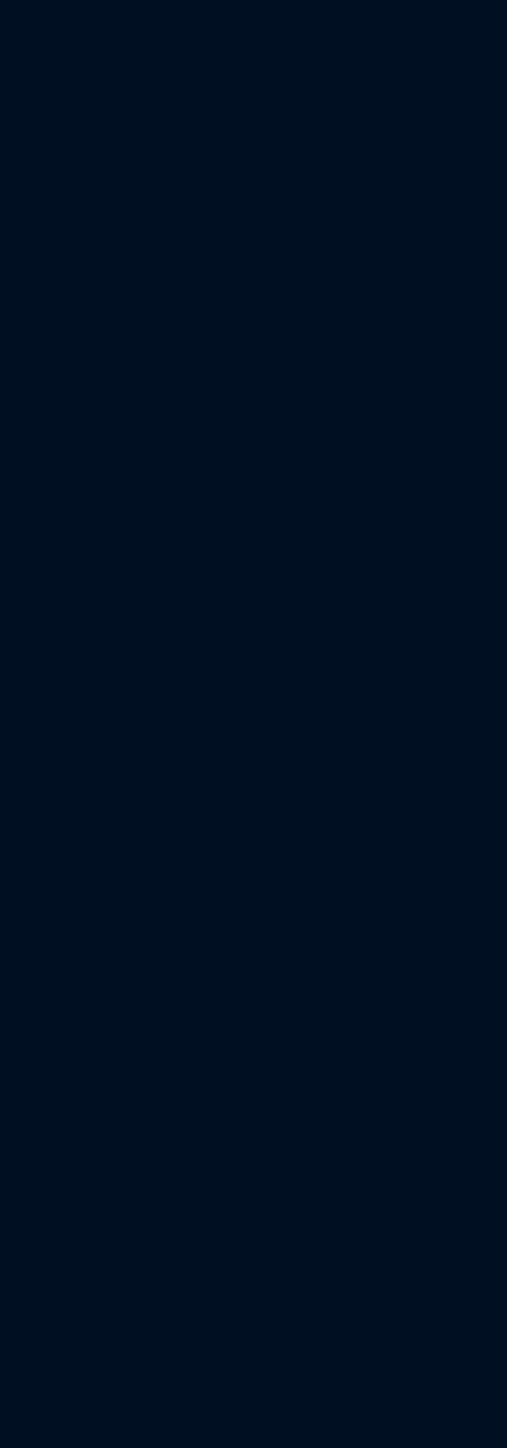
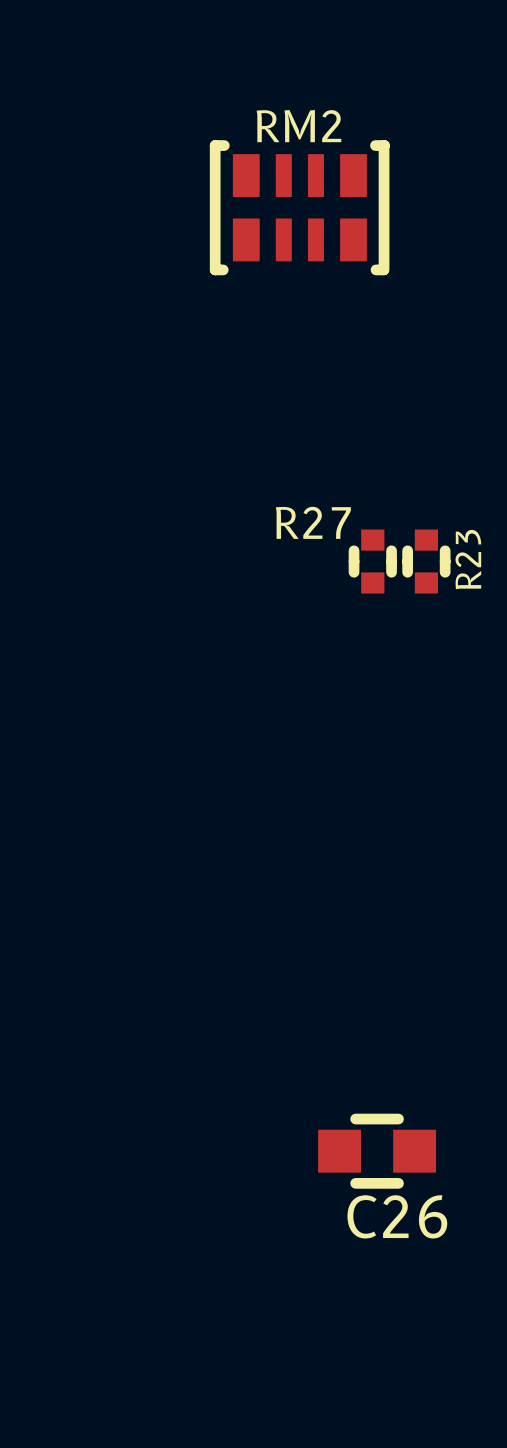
RM2: none -> (299, 207)
R27: none -> (372, 561)
R23: none -> (426, 561)
C26: none -> (377, 1151)

